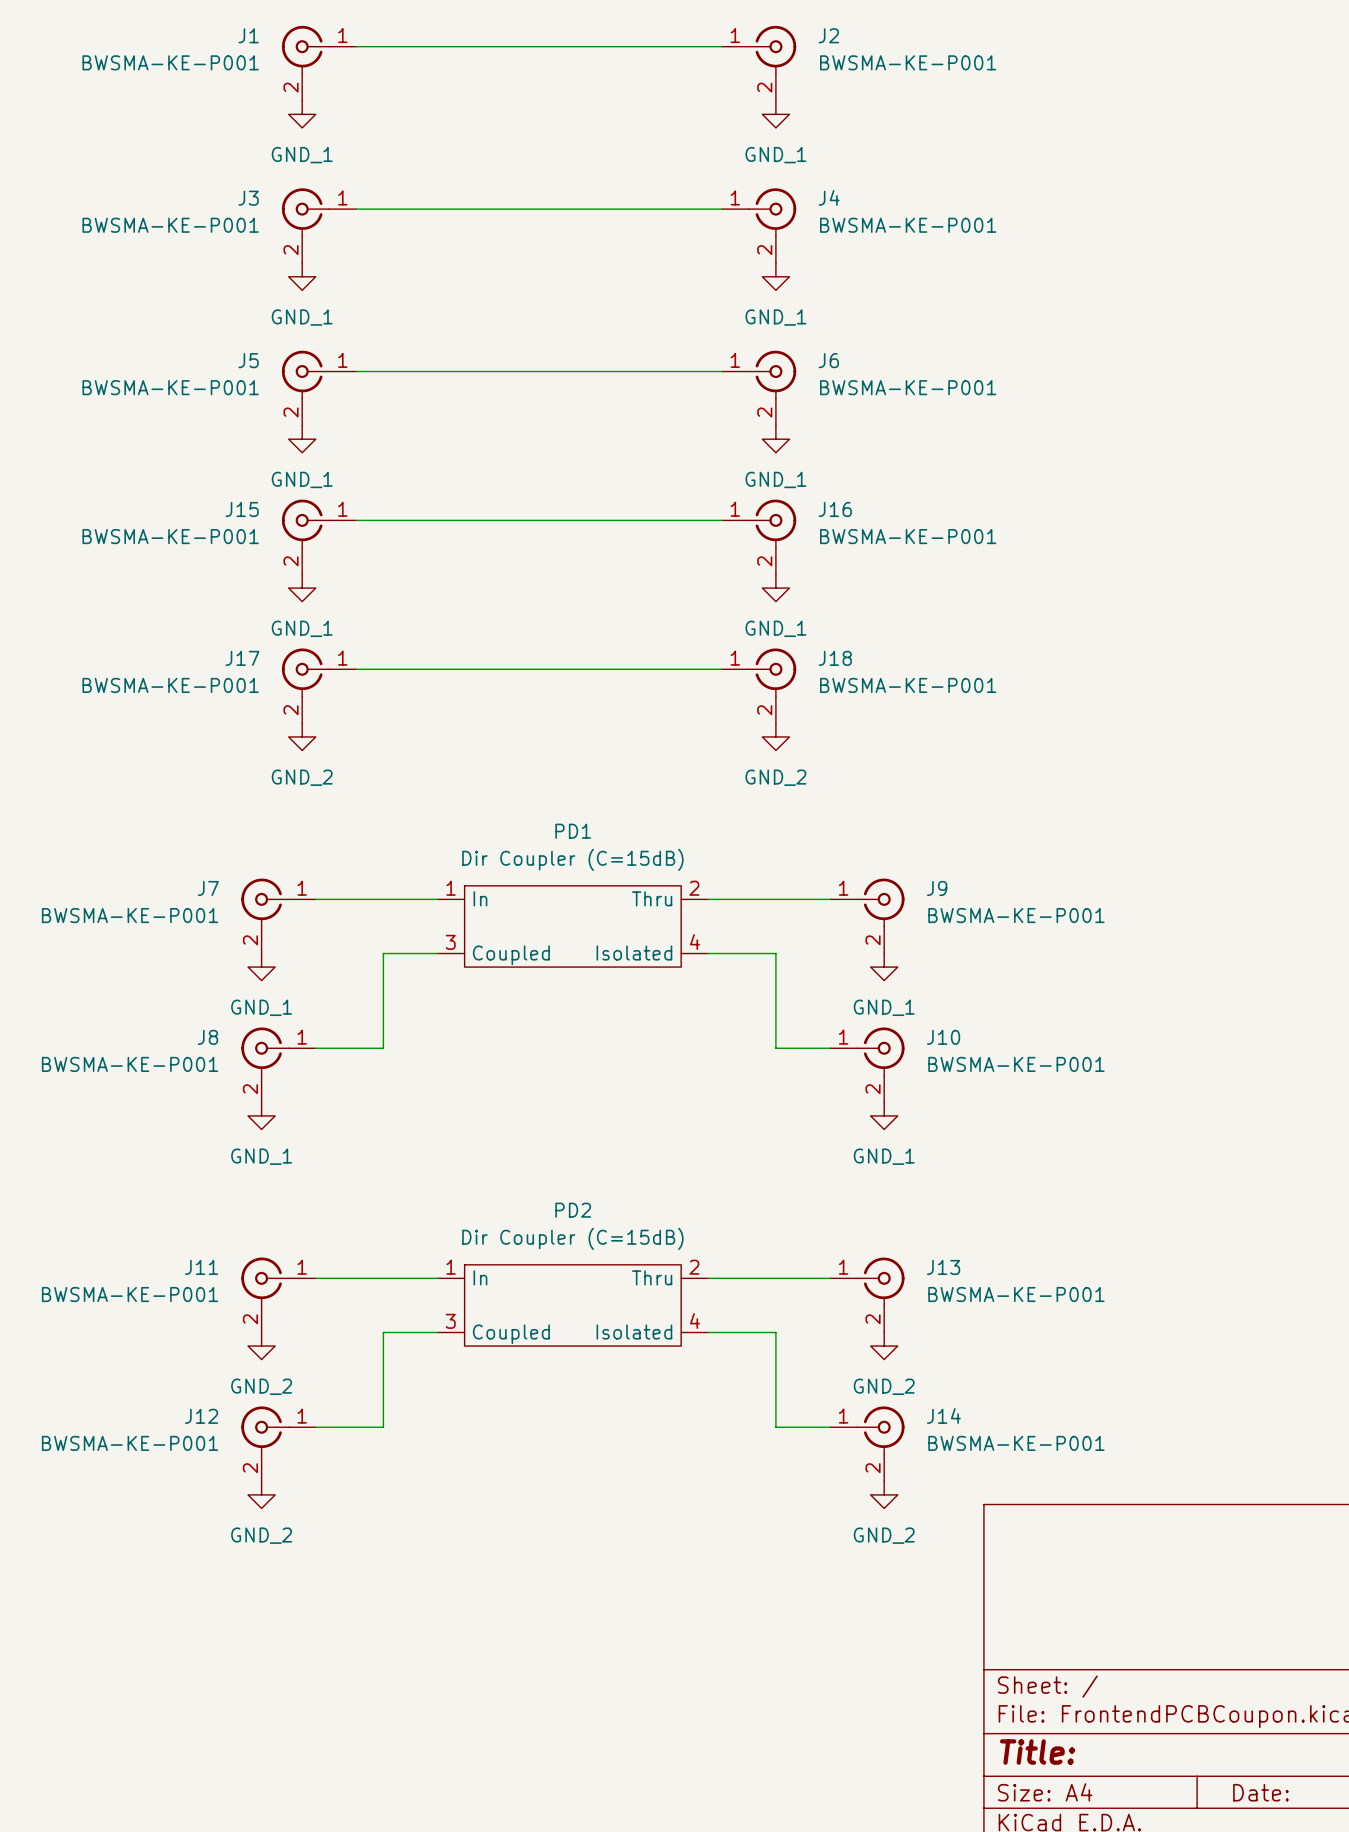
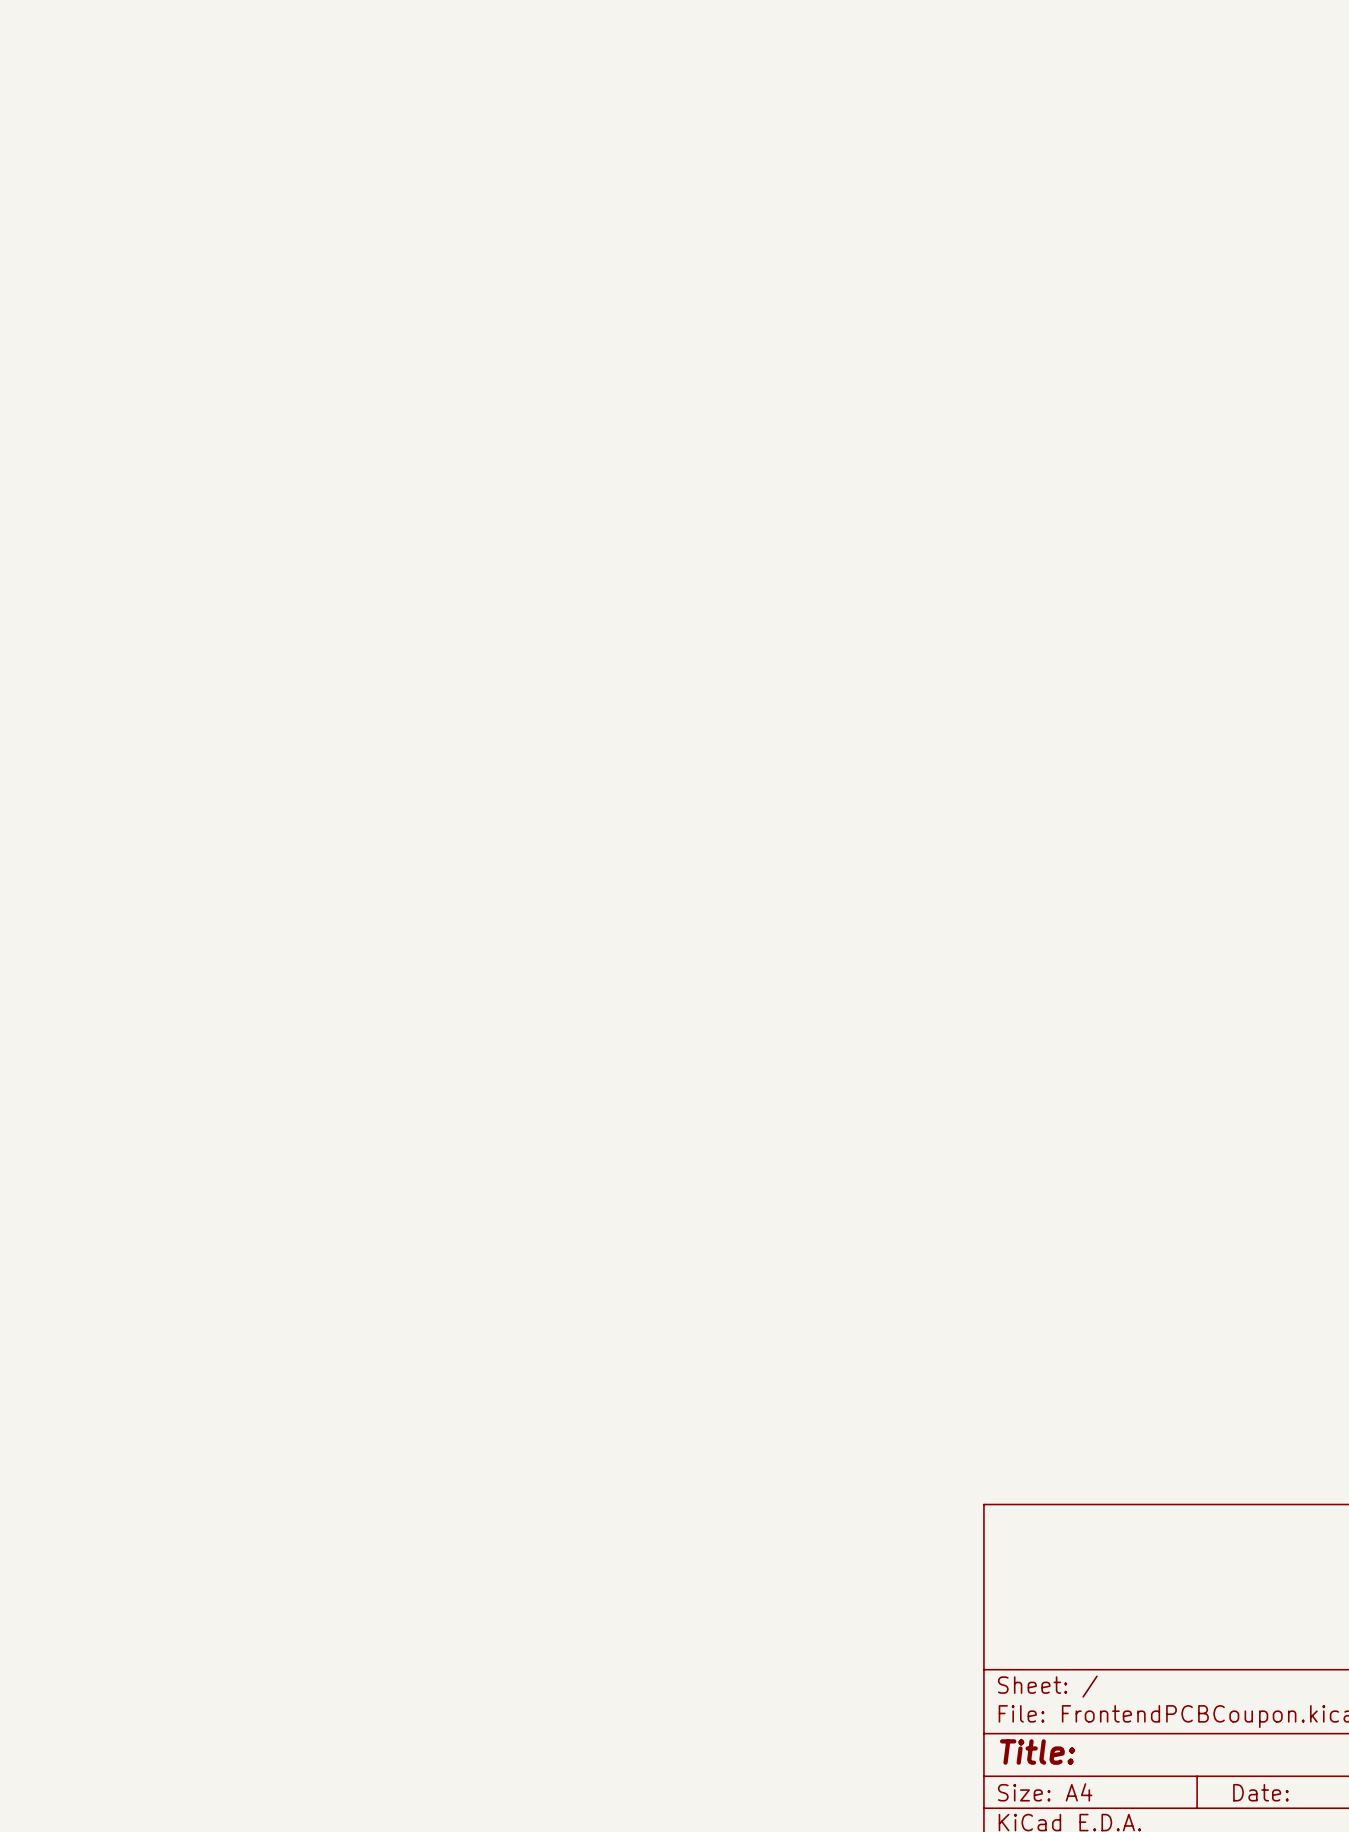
wire: (356, 46) (721, 46) -> none
J1: BWSMA-KE-P001 (319, 63) -> none
J2: BWSMA-KE-P001 (758, 63) -> none
power symbol: GND_1 (302, 114) -> none
power symbol: GND_1 (775, 114) -> none
wire: (356, 209) (721, 209) -> none
J3: BWSMA-KE-P001 (319, 225) -> none
J4: BWSMA-KE-P001 (758, 225) -> none
power symbol: GND_1 (302, 276) -> none
power symbol: GND_1 (775, 276) -> none
wire: (356, 371) (721, 371) -> none
J5: BWSMA-KE-P001 (319, 388) -> none
J6: BWSMA-KE-P001 (758, 388) -> none
power symbol: GND_1 (302, 439) -> none
power symbol: GND_1 (775, 439) -> none
wire: (356, 520) (721, 520) -> none
J15: BWSMA-KE-P001 (319, 537) -> none
J16: BWSMA-KE-P001 (758, 537) -> none
power symbol: GND_1 (302, 588) -> none
power symbol: GND_1 (775, 588) -> none
wire: (356, 669) (721, 669) -> none
J17: BWSMA-KE-P001 (319, 685) -> none
J18: BWSMA-KE-P001 (758, 685) -> none
power symbol: GND_2 (302, 736) -> none
power symbol: GND_2 (775, 736) -> none
wire: (315, 899) (437, 899) -> none
wire: (708, 899) (830, 899) -> none
J7: BWSMA-KE-P001 (278, 916) -> none
J9: BWSMA-KE-P001 (867, 916) -> none
PD1: Dir Coupler (C=15dB) (572, 926) -> none
wire: (437, 953) (383, 953) (383, 1048) (315, 1048) -> none
wire: (708, 953) (775, 953) (775, 1048) (830, 1048) -> none
power symbol: GND_1 (261, 967) -> none
power symbol: GND_1 (884, 967) -> none
J8: BWSMA-KE-P001 (278, 1064) -> none
J10: BWSMA-KE-P001 (867, 1064) -> none
power symbol: GND_1 (261, 1115) -> none
power symbol: GND_1 (884, 1115) -> none
wire: (315, 1278) (437, 1278) -> none
wire: (708, 1278) (830, 1278) -> none
J11: BWSMA-KE-P001 (278, 1295) -> none
J13: BWSMA-KE-P001 (867, 1295) -> none
PD2: Dir Coupler (C=15dB) (572, 1305) -> none
wire: (437, 1332) (383, 1332) (383, 1427) (315, 1427) -> none
wire: (708, 1332) (775, 1332) (775, 1427) (830, 1427) -> none
power symbol: GND_2 (261, 1346) -> none
power symbol: GND_2 (884, 1346) -> none
J12: BWSMA-KE-P001 (278, 1443) -> none
J14: BWSMA-KE-P001 (867, 1443) -> none
power symbol: GND_2 (261, 1494) -> none
power symbol: GND_2 (884, 1494) -> none

